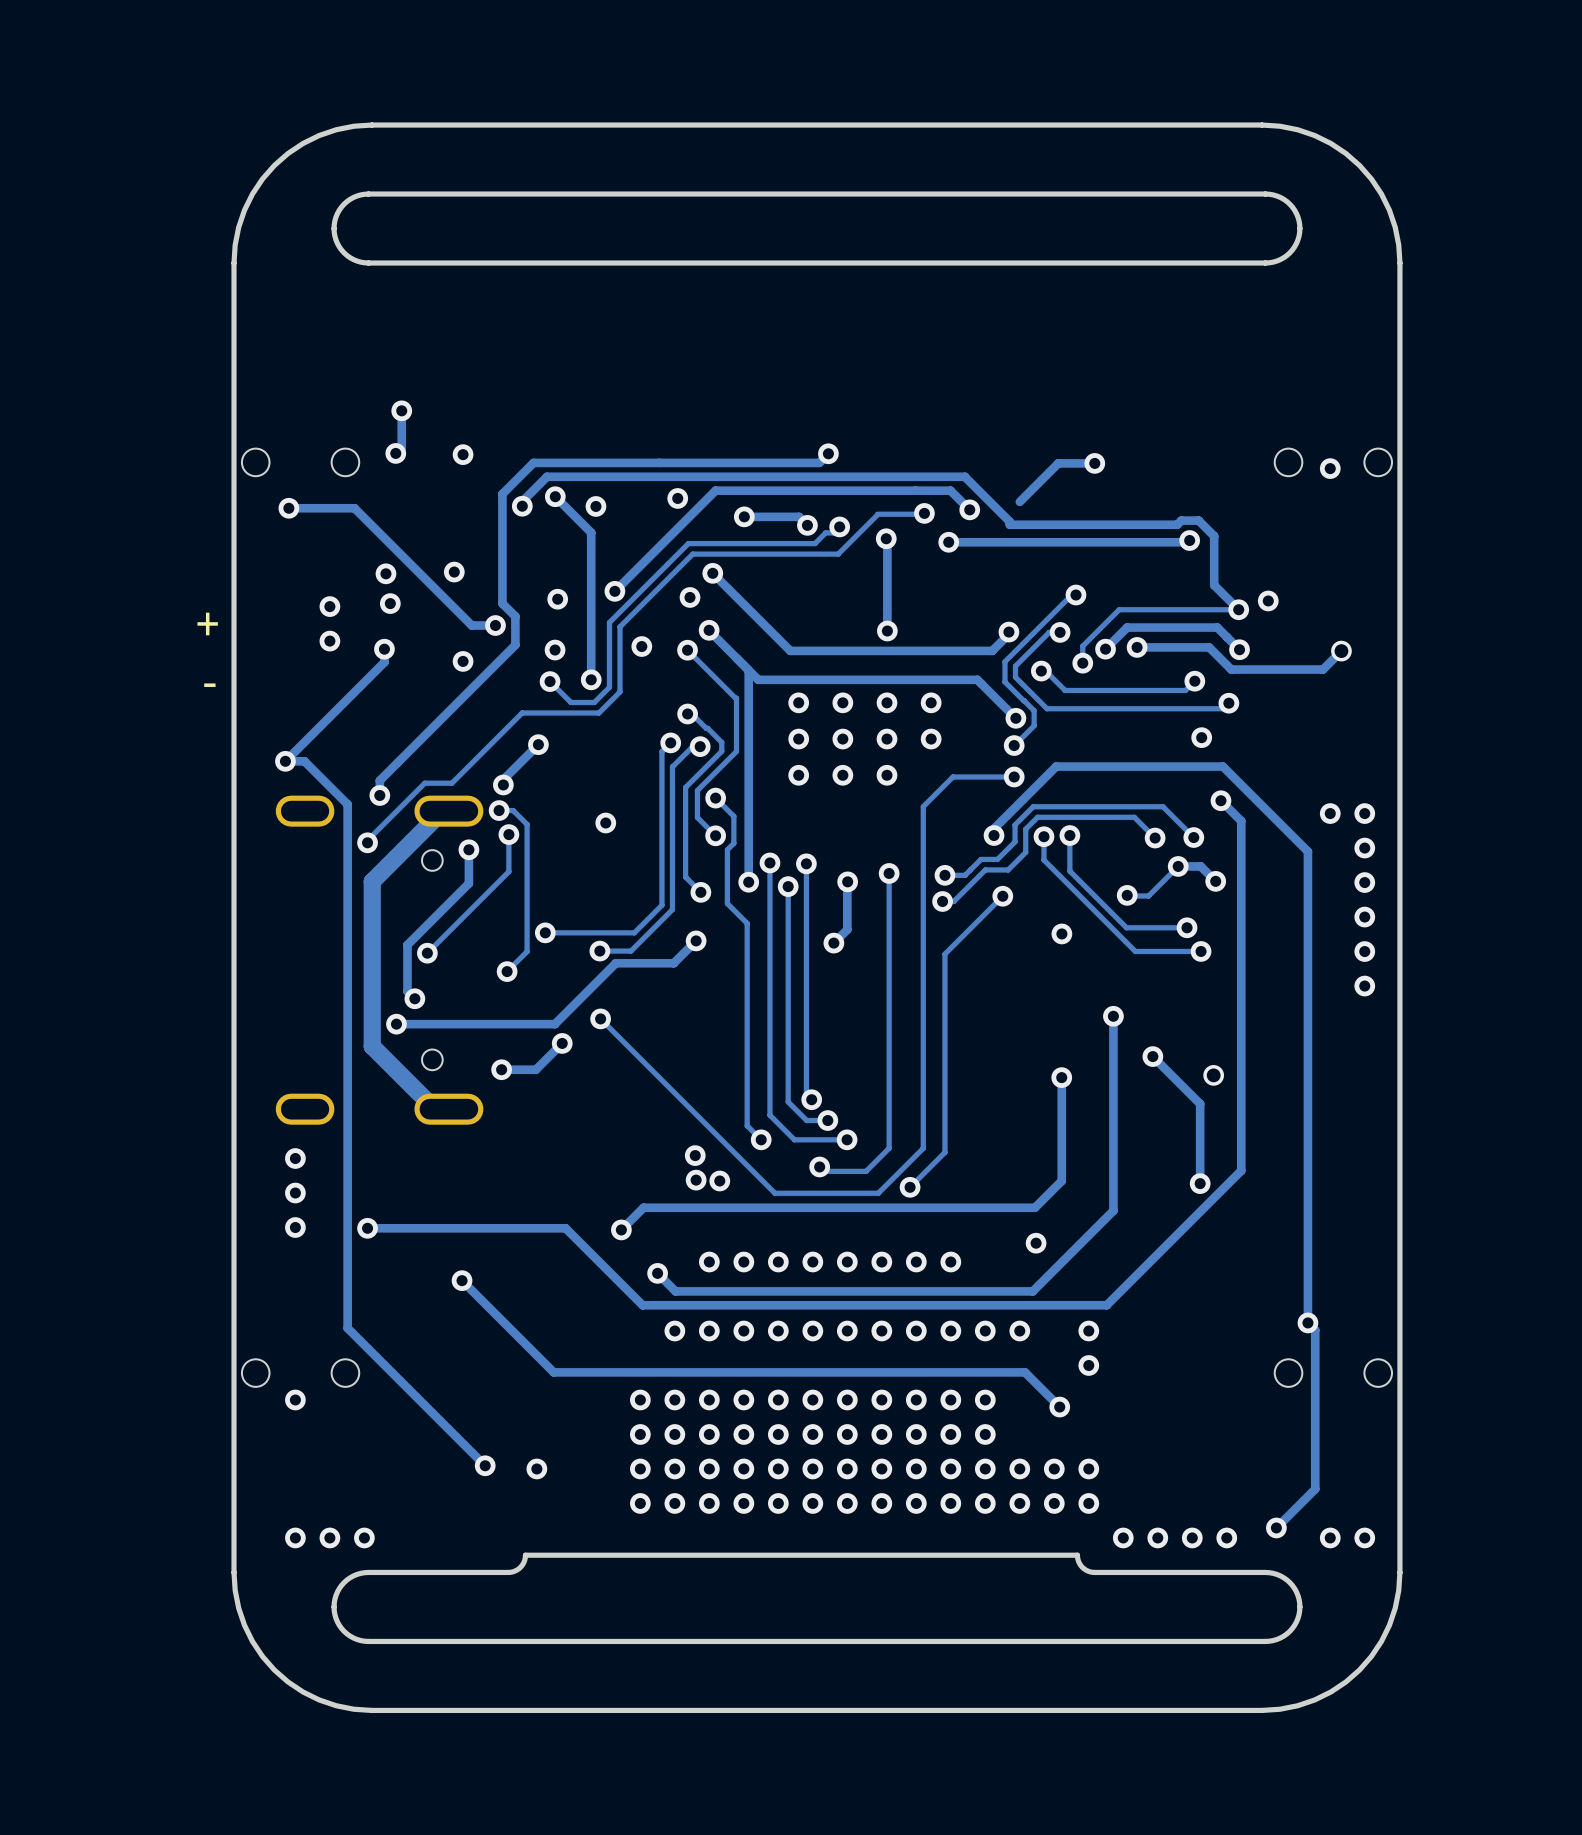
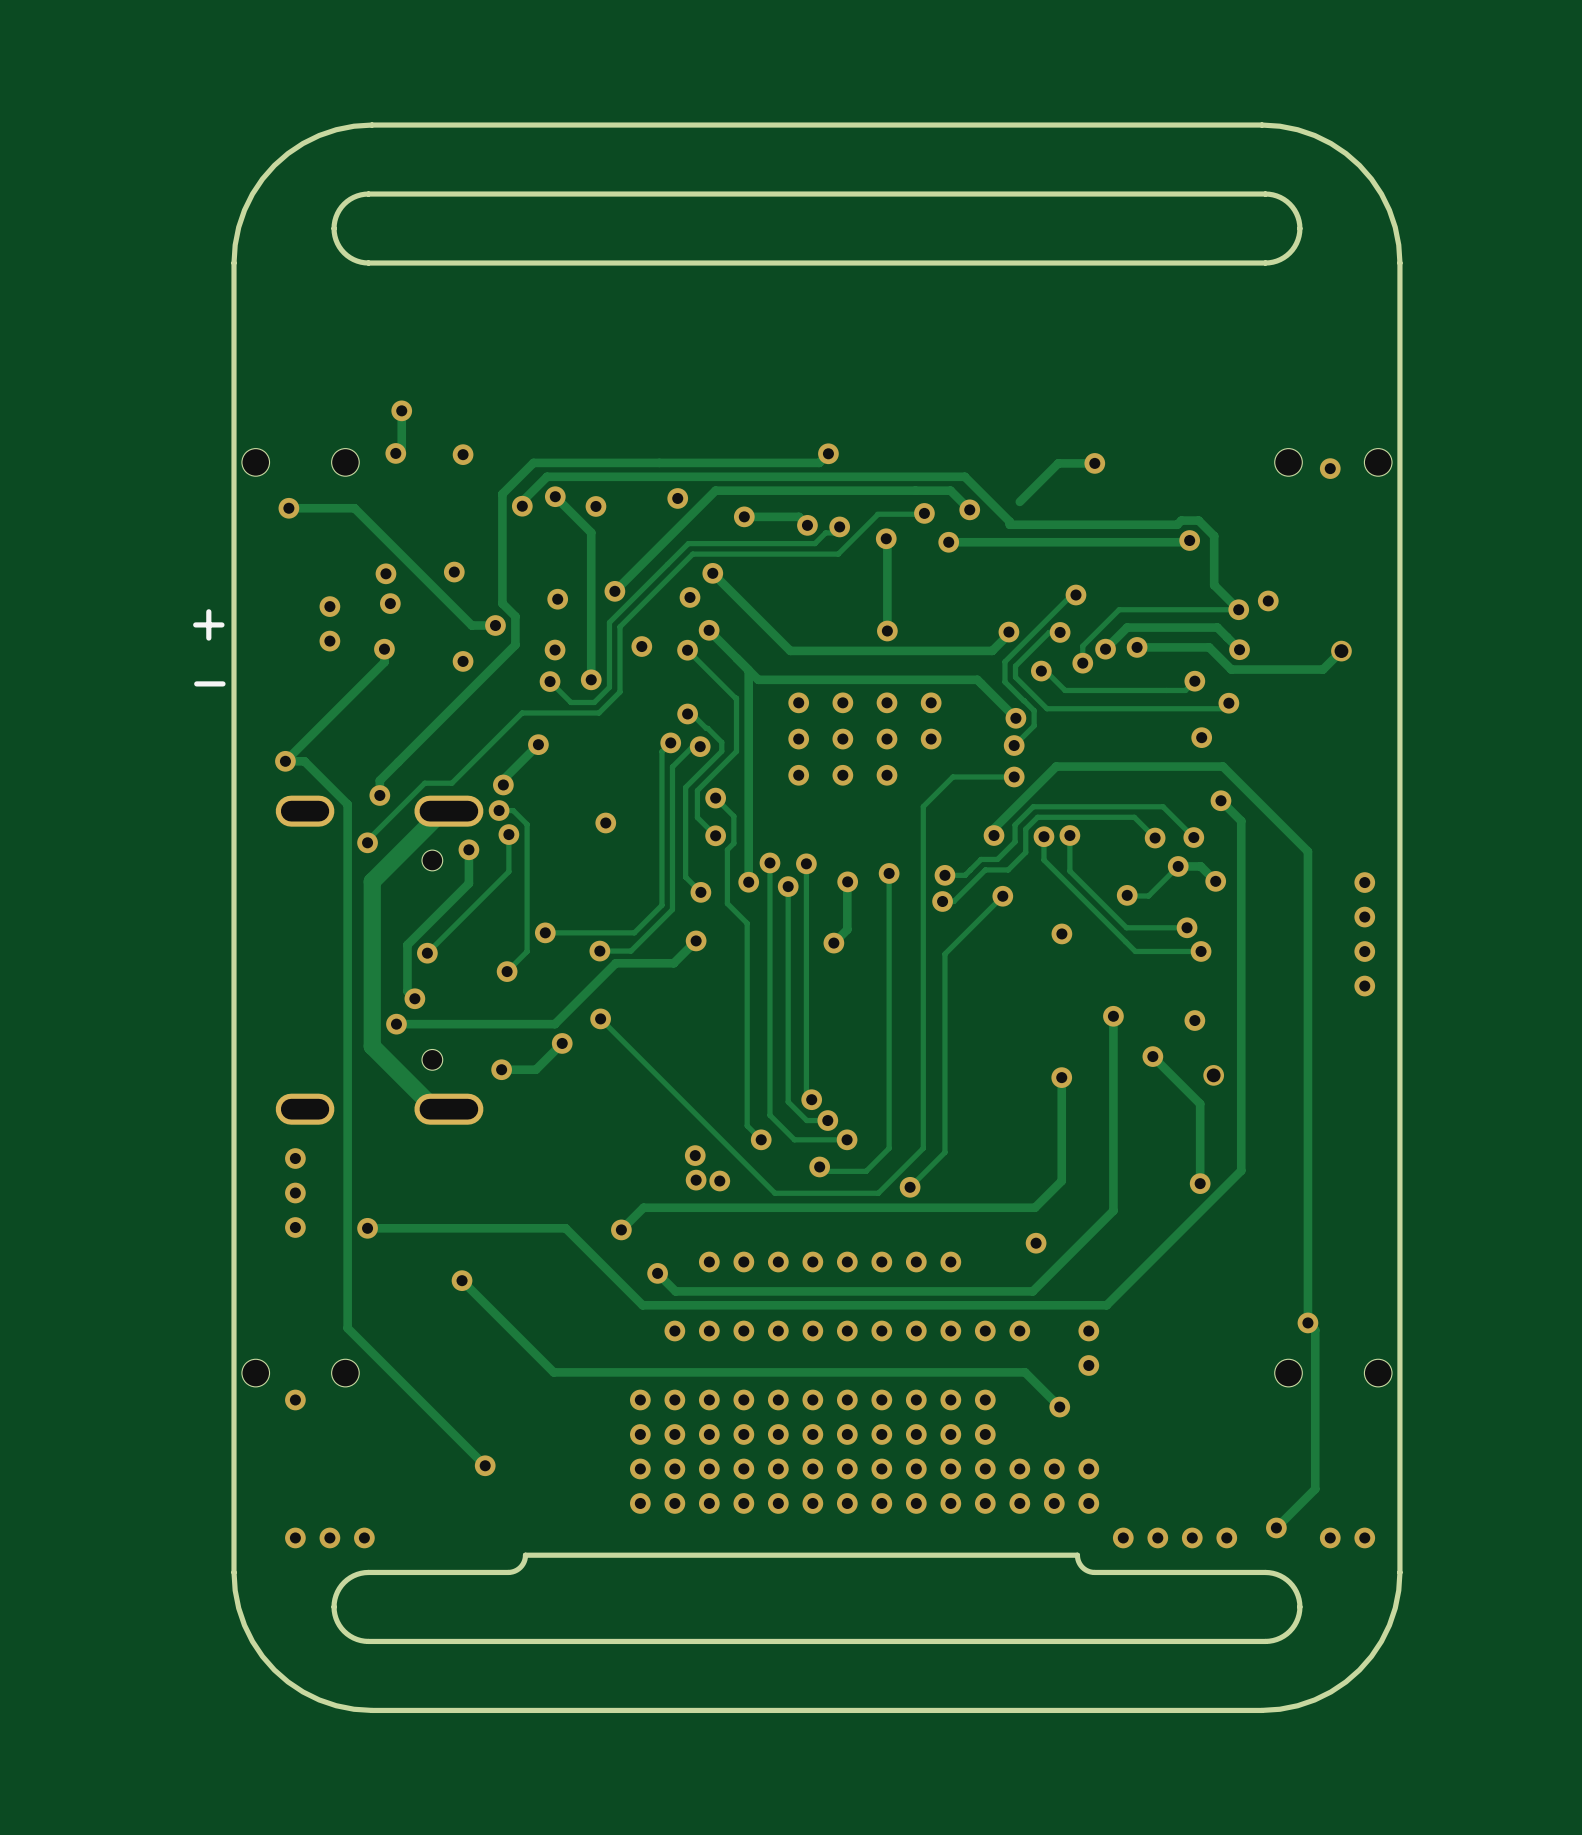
via: (1330, 813) -> none
via: (1364, 813) -> none
via: (1364, 848) -> none
via: none -> (1194, 1020)
via: (536, 1468) -> none

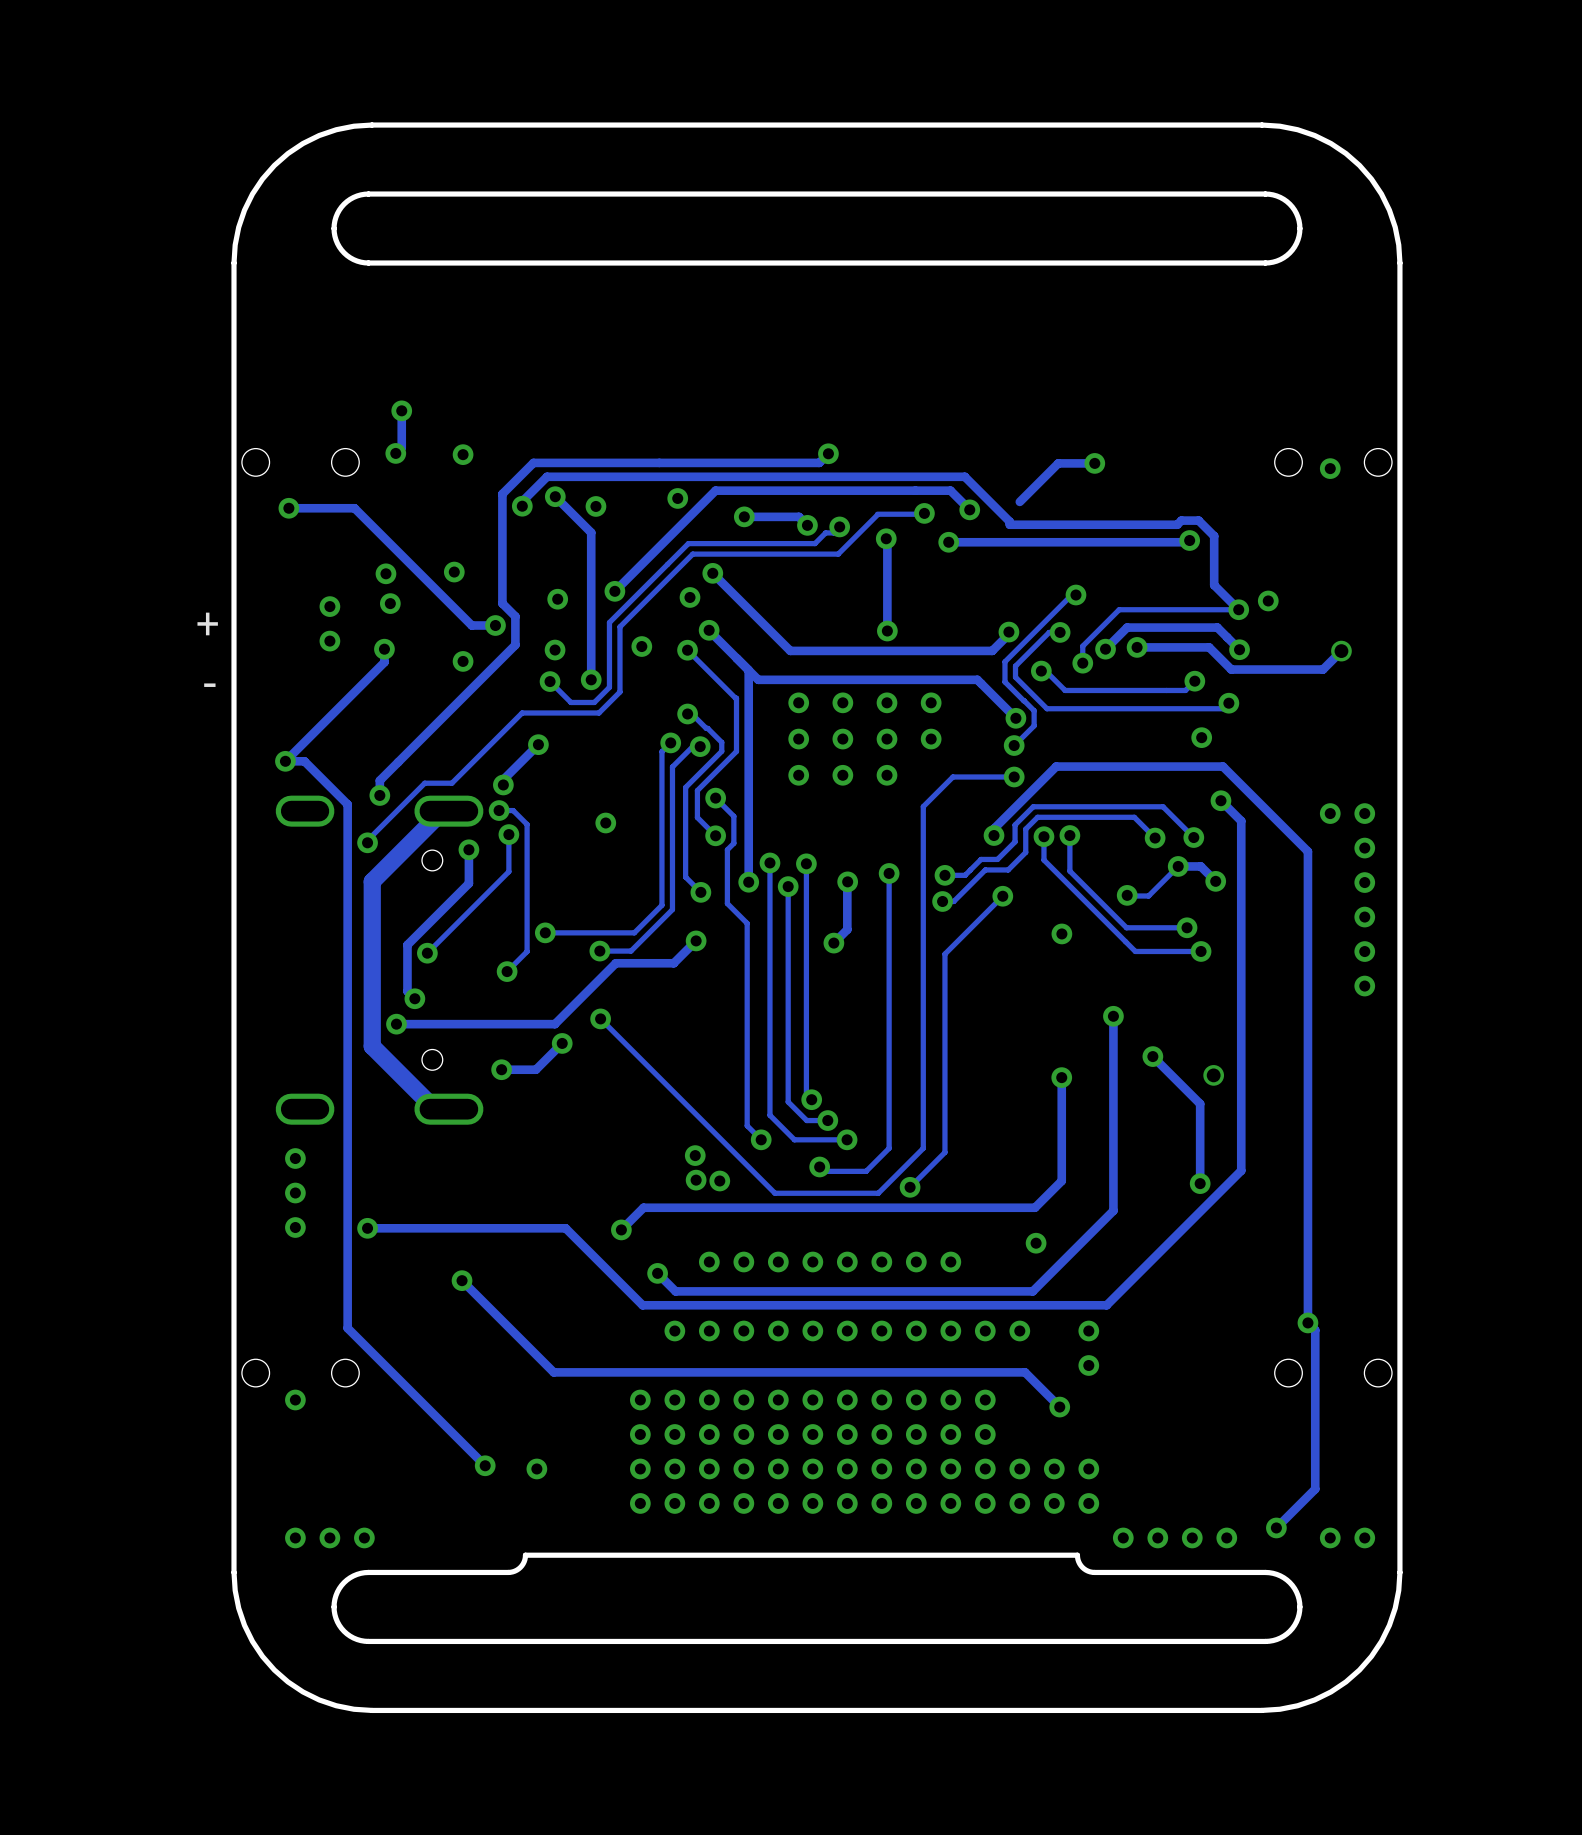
via: none -> (1330, 813)
via: none -> (1364, 813)
via: none -> (1364, 848)
via: (1194, 1020) -> none
via: none -> (536, 1468)

